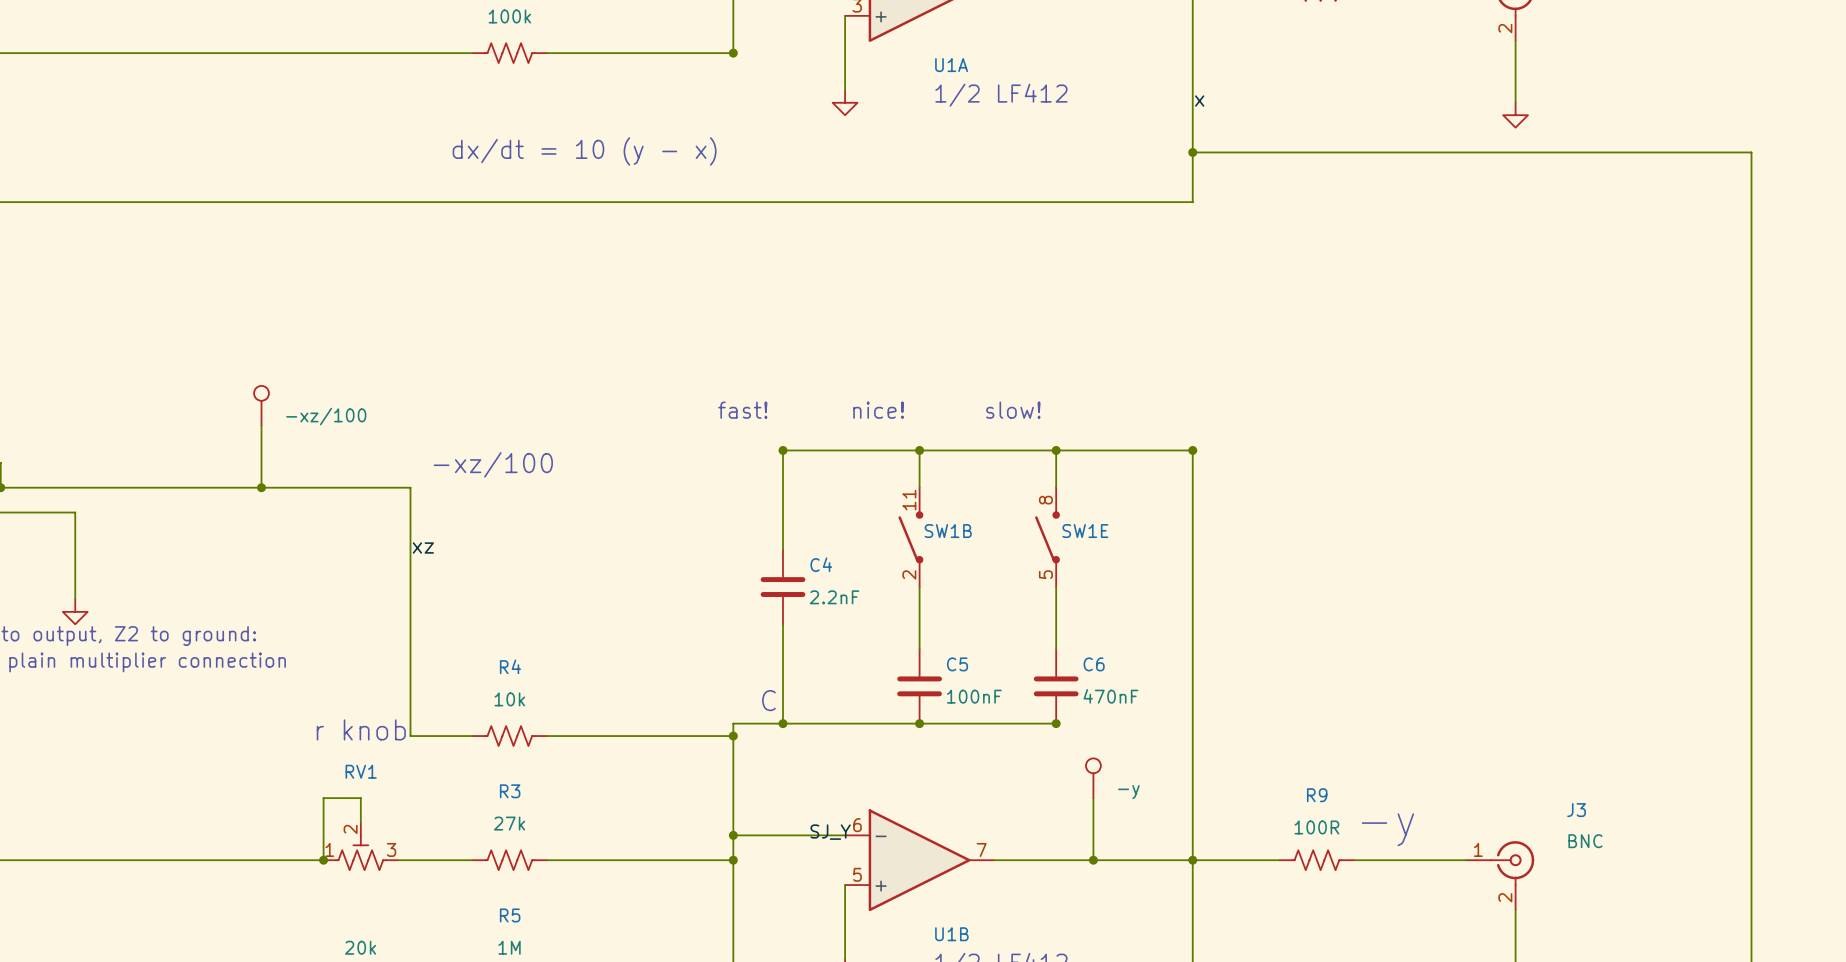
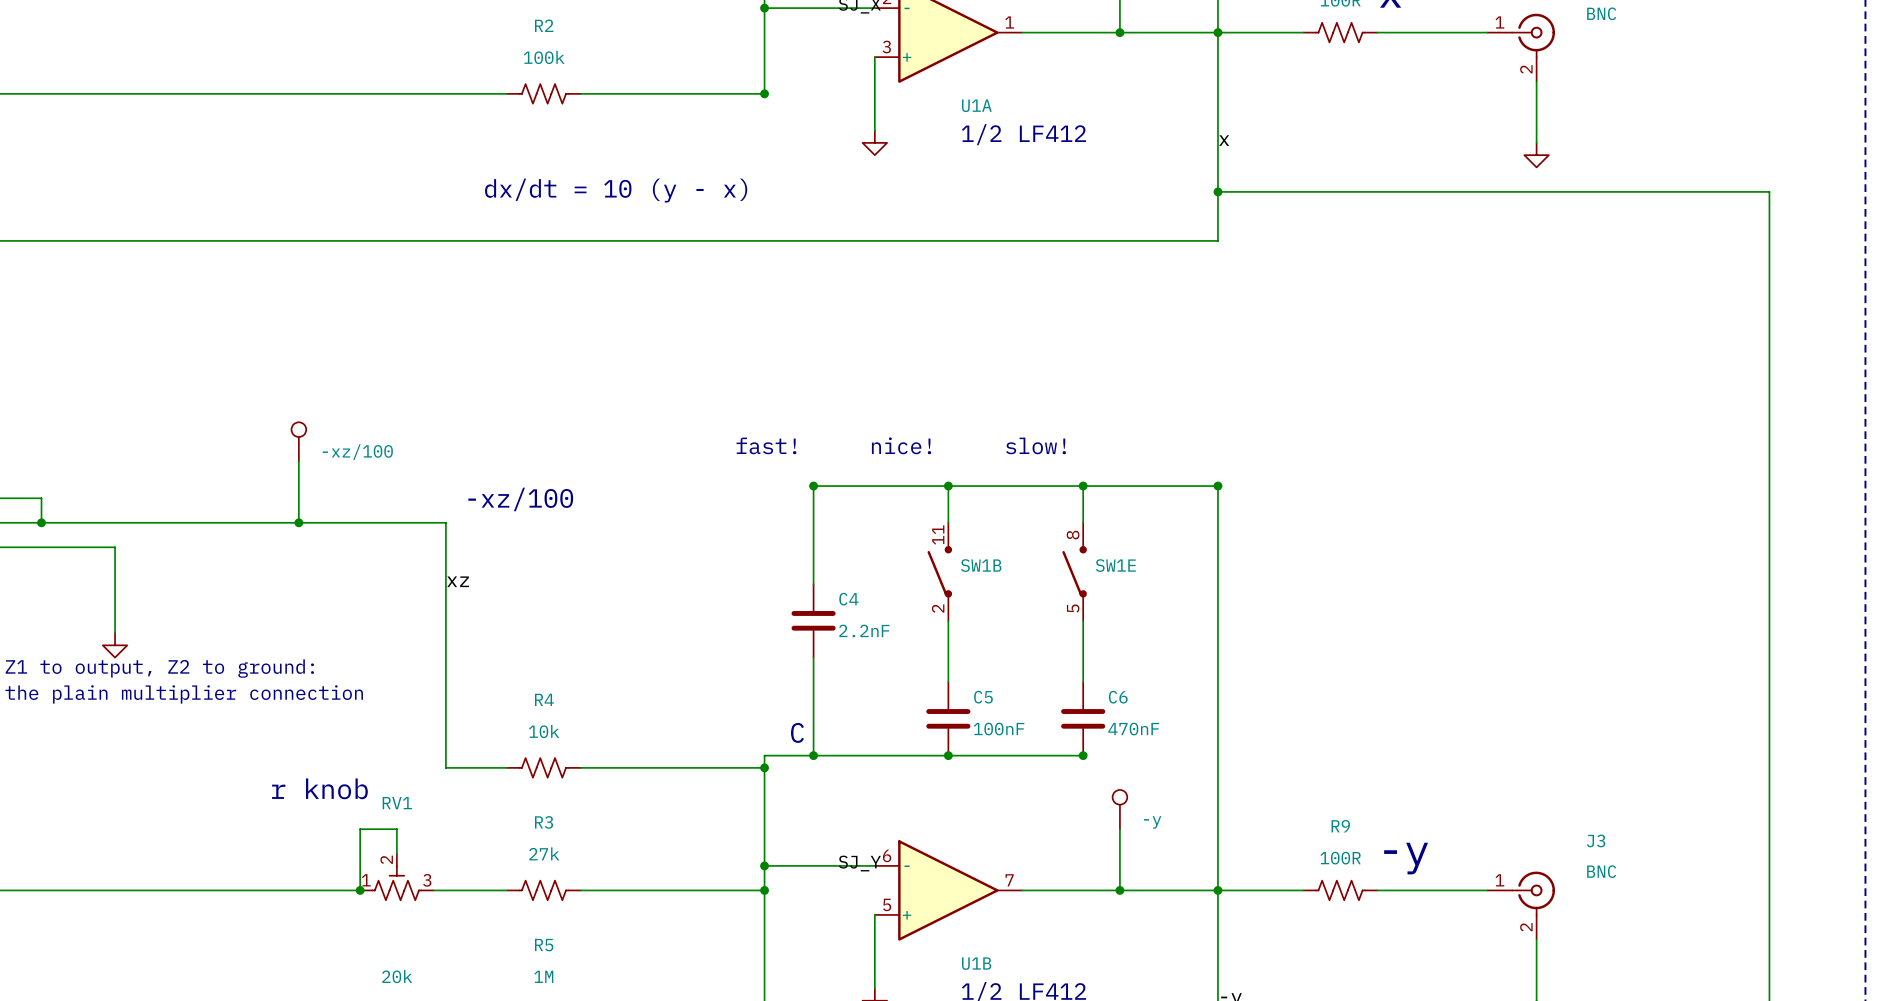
text position: r knob (361, 729) -> r knob (319, 788)

